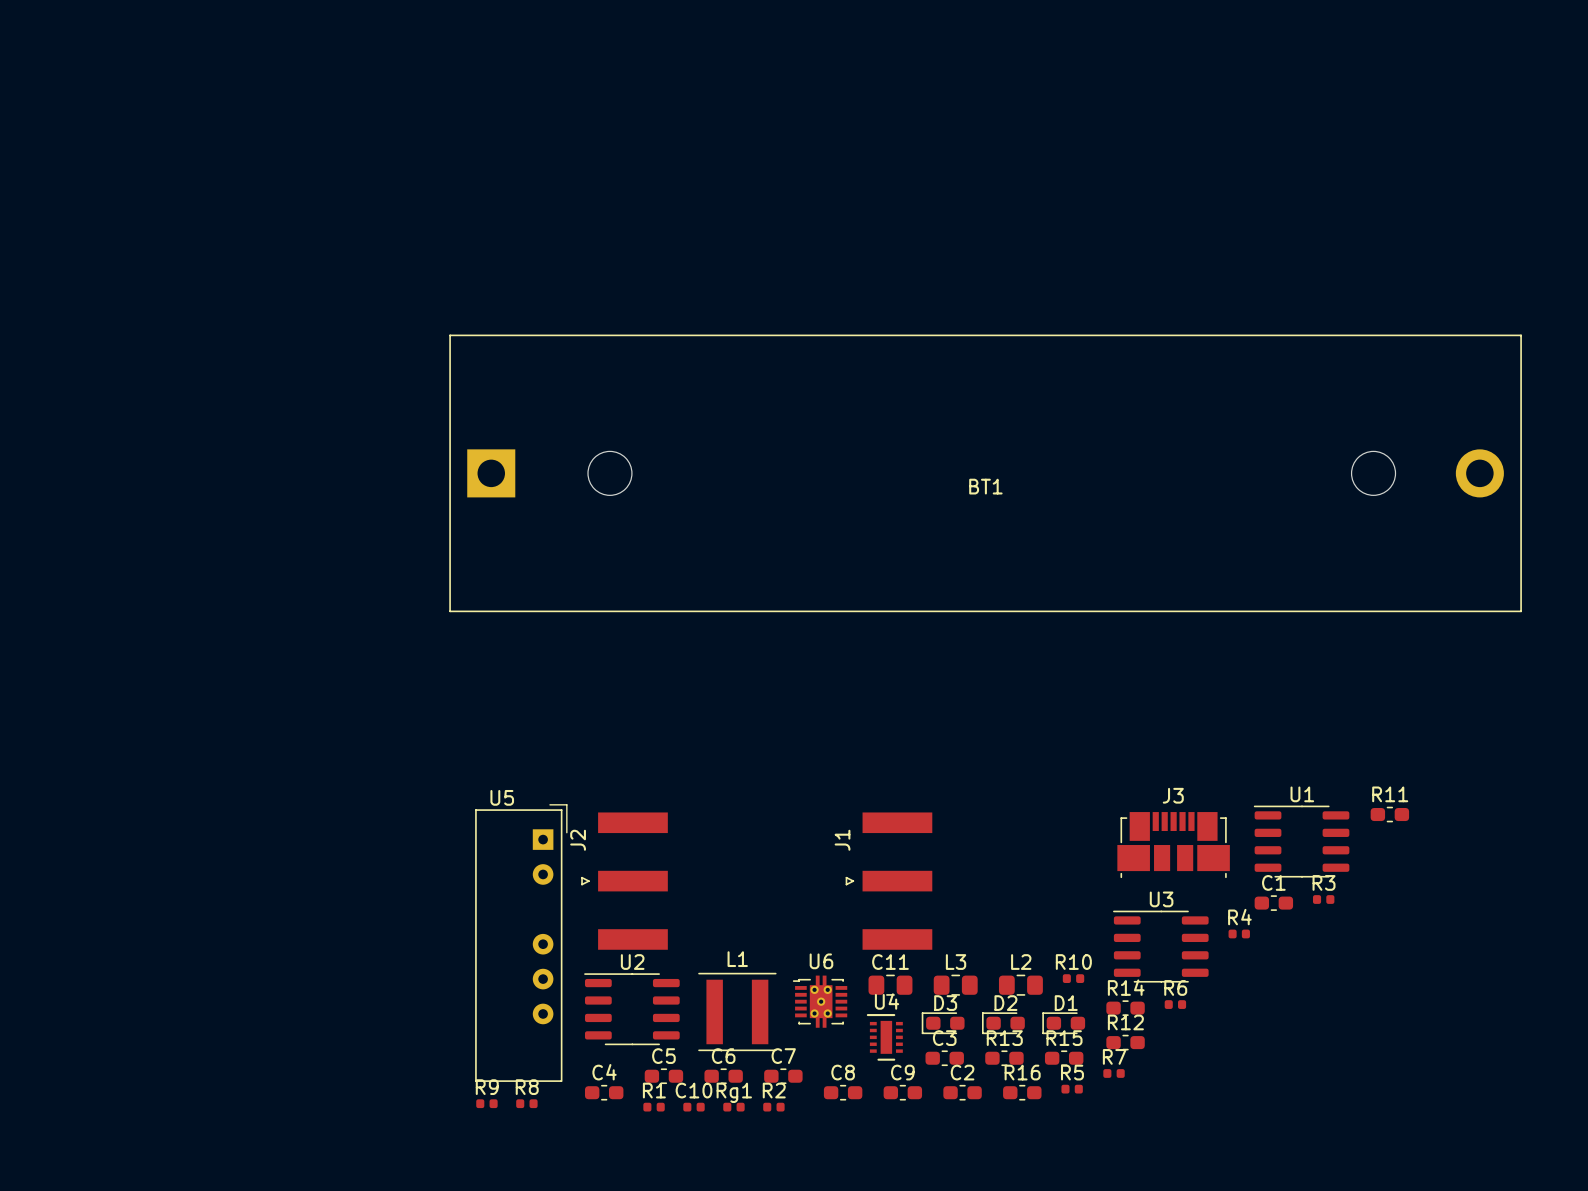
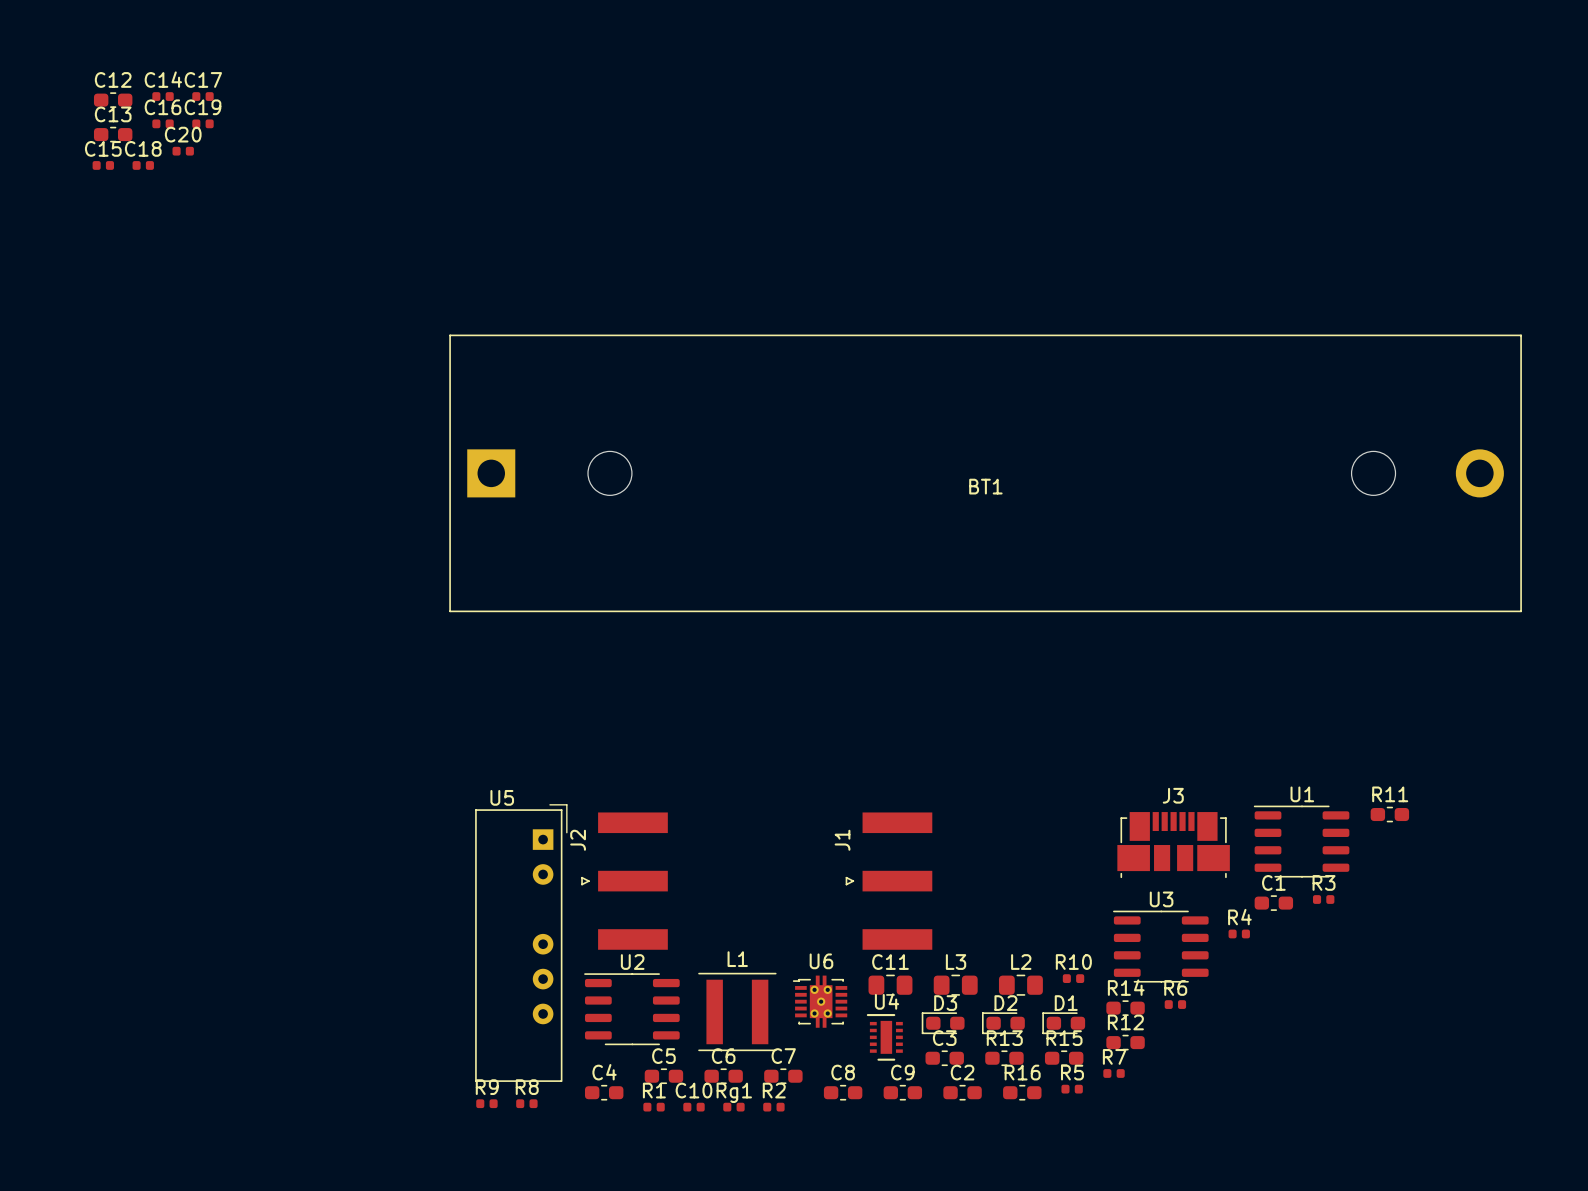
C14: none -> (163, 96)
C17: none -> (202, 96)
C12: none -> (113, 100)
C16: none -> (163, 123)
C19: none -> (202, 123)
C13: none -> (113, 134)
C20: none -> (183, 151)
C15: none -> (103, 165)
C18: none -> (143, 165)

